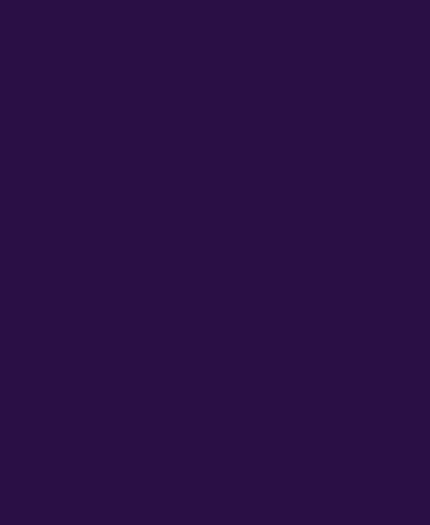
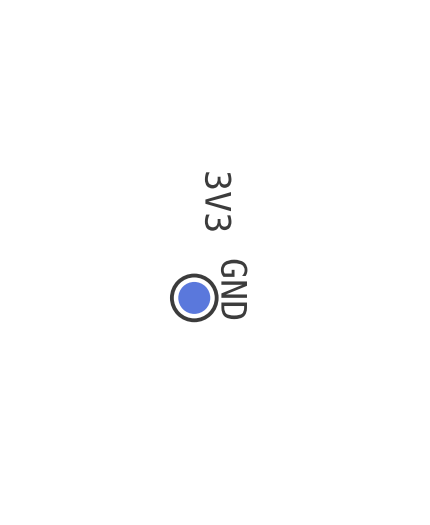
text: none -> 3V3 (218, 201)
part: none -> (194, 297)
text: none -> GND (234, 289)

